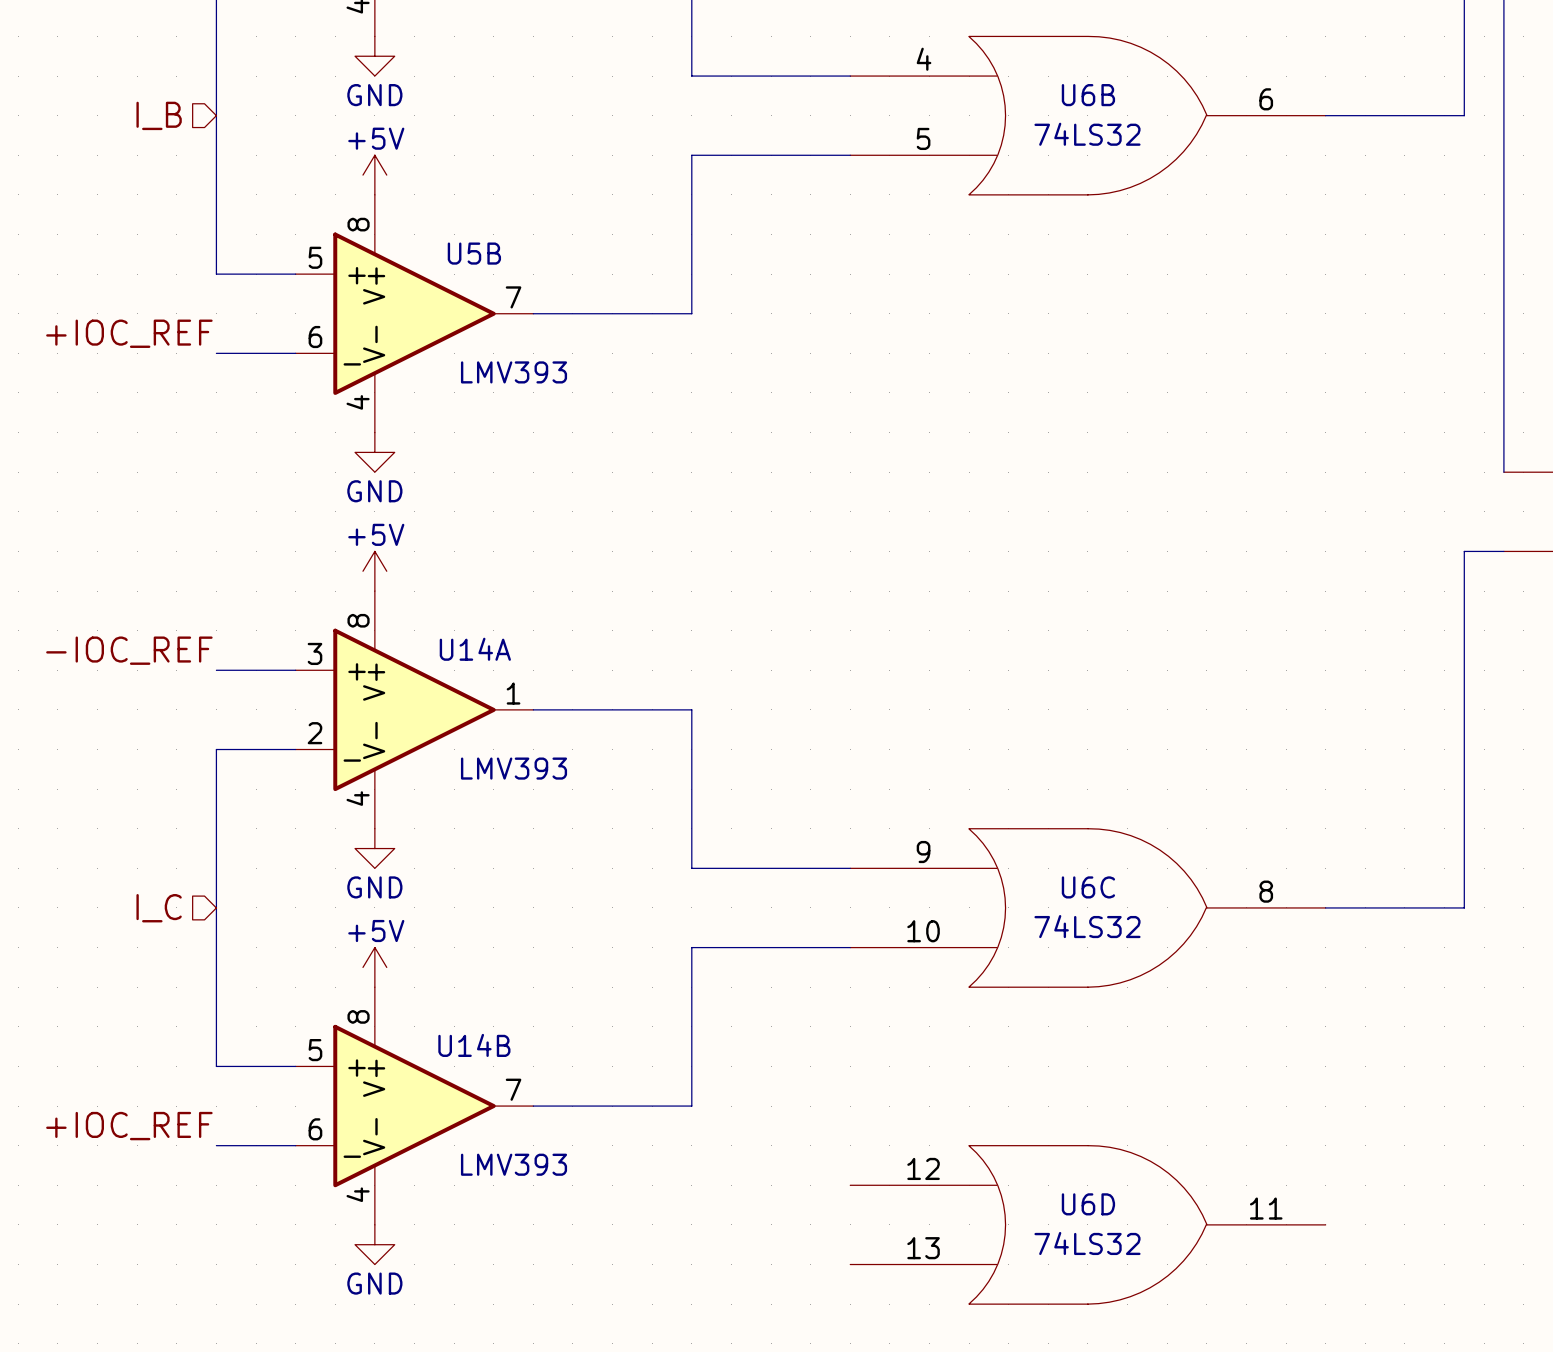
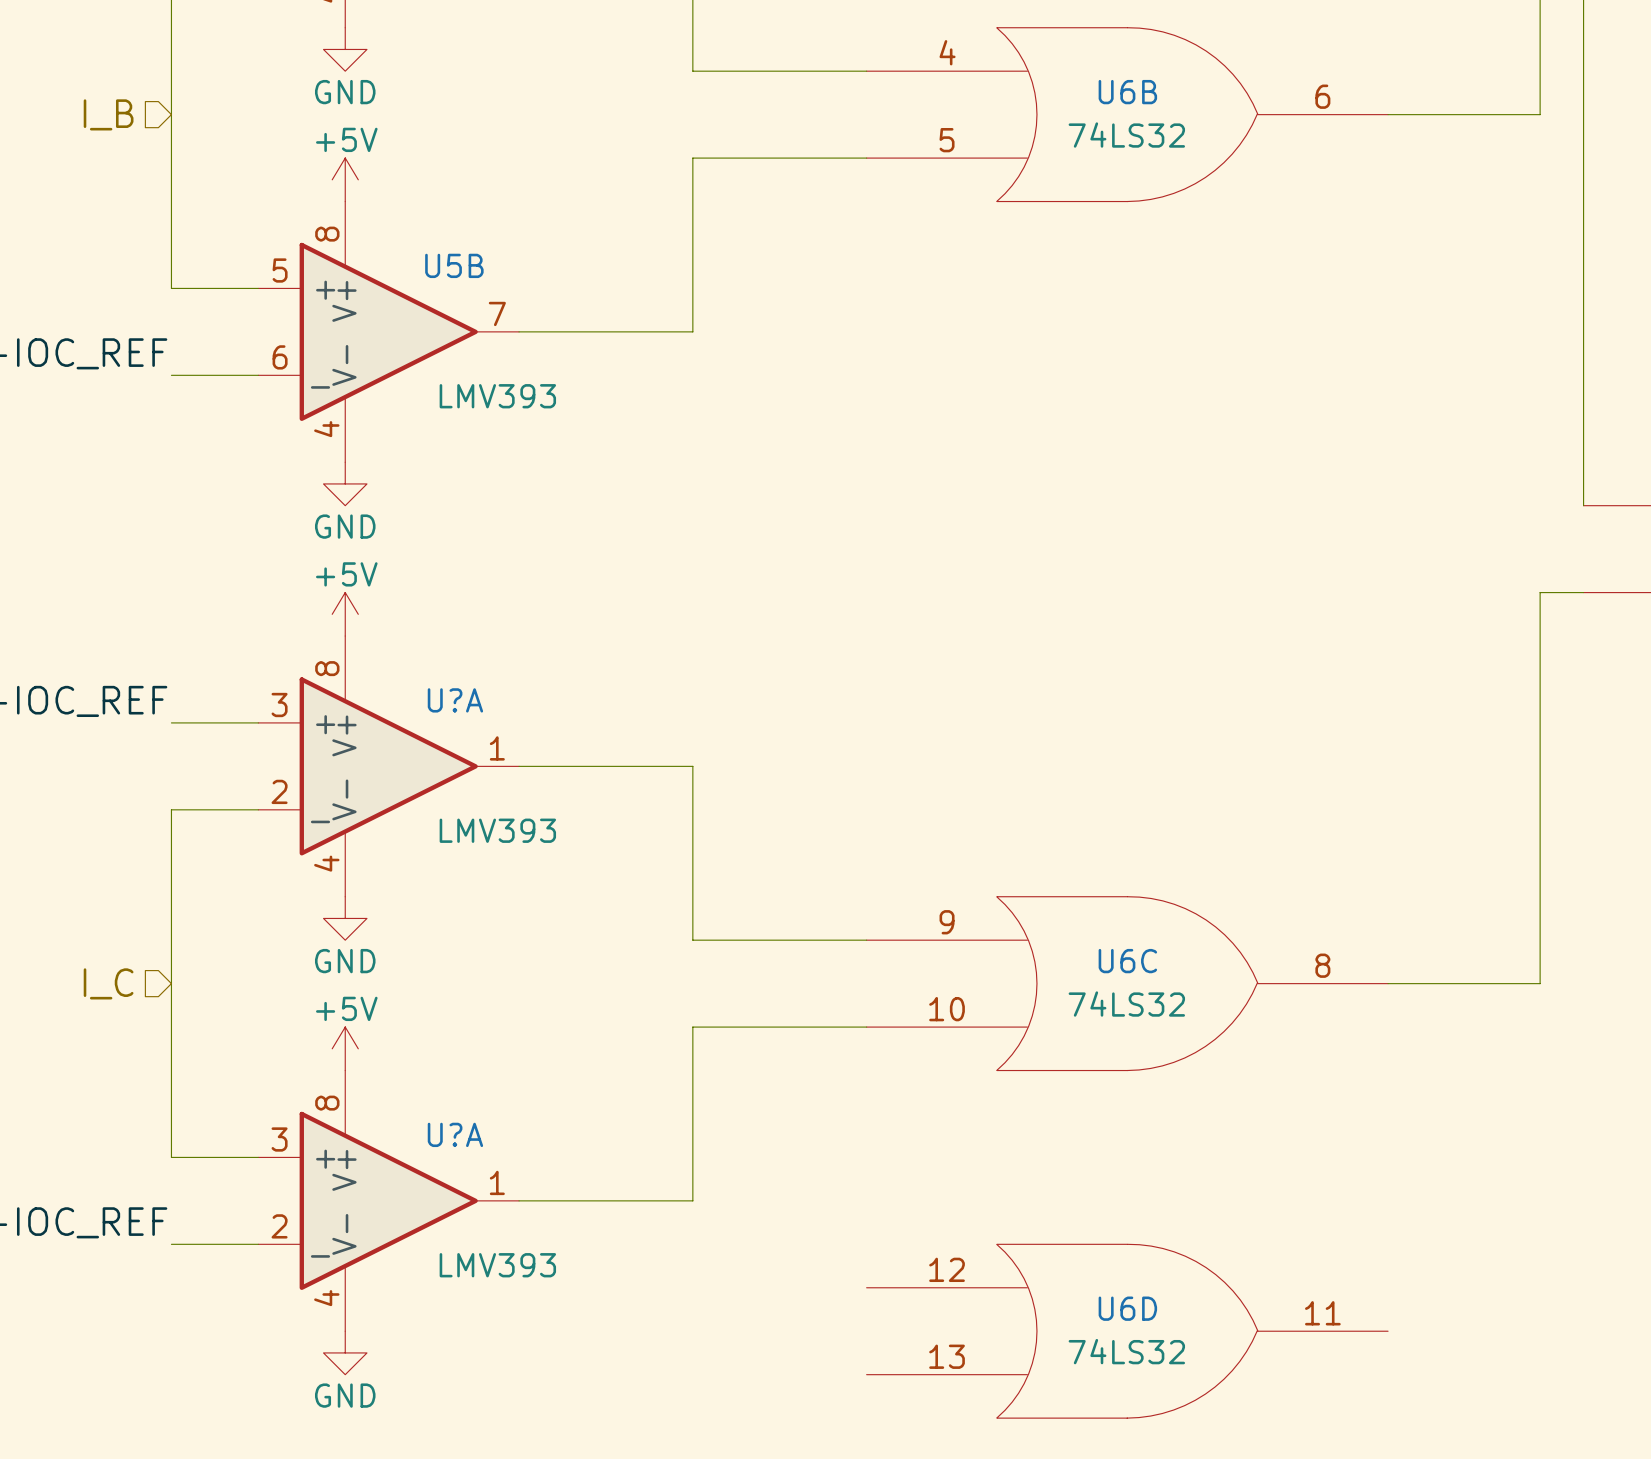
U14A name: U14A (475, 649) -> U?A (455, 700)
U14B name: U14B (474, 1045) -> U?A (455, 1134)
U14B pin number: 5 (315, 1050) -> 3 (279, 1139)
U14B pin number: 7 (513, 1089) -> 1 (497, 1182)
U14B pin number: 6 (315, 1129) -> 2 (279, 1226)

